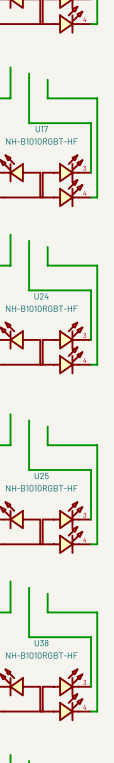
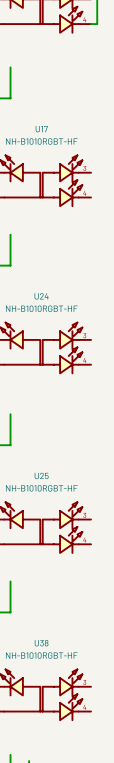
wire: (29, 73) (29, 123) (91, 123) (91, 172) -> none
wire: (47, 79) (47, 98) (97, 98) (97, 197) (91, 197) -> none
wire: (29, 240) (29, 290) (91, 290) (91, 339) -> none
wire: (47, 247) (47, 265) (97, 265) (97, 364) (91, 364) -> none
wire: (29, 420) (29, 469) (91, 469) (91, 519) -> none
wire: (47, 426) (47, 445) (97, 445) (97, 544) (91, 544) -> none
wire: (29, 587) (29, 637) (91, 637) (91, 686) -> none
wire: (47, 593) (47, 612) (97, 612) (97, 711) (91, 711) -> none

